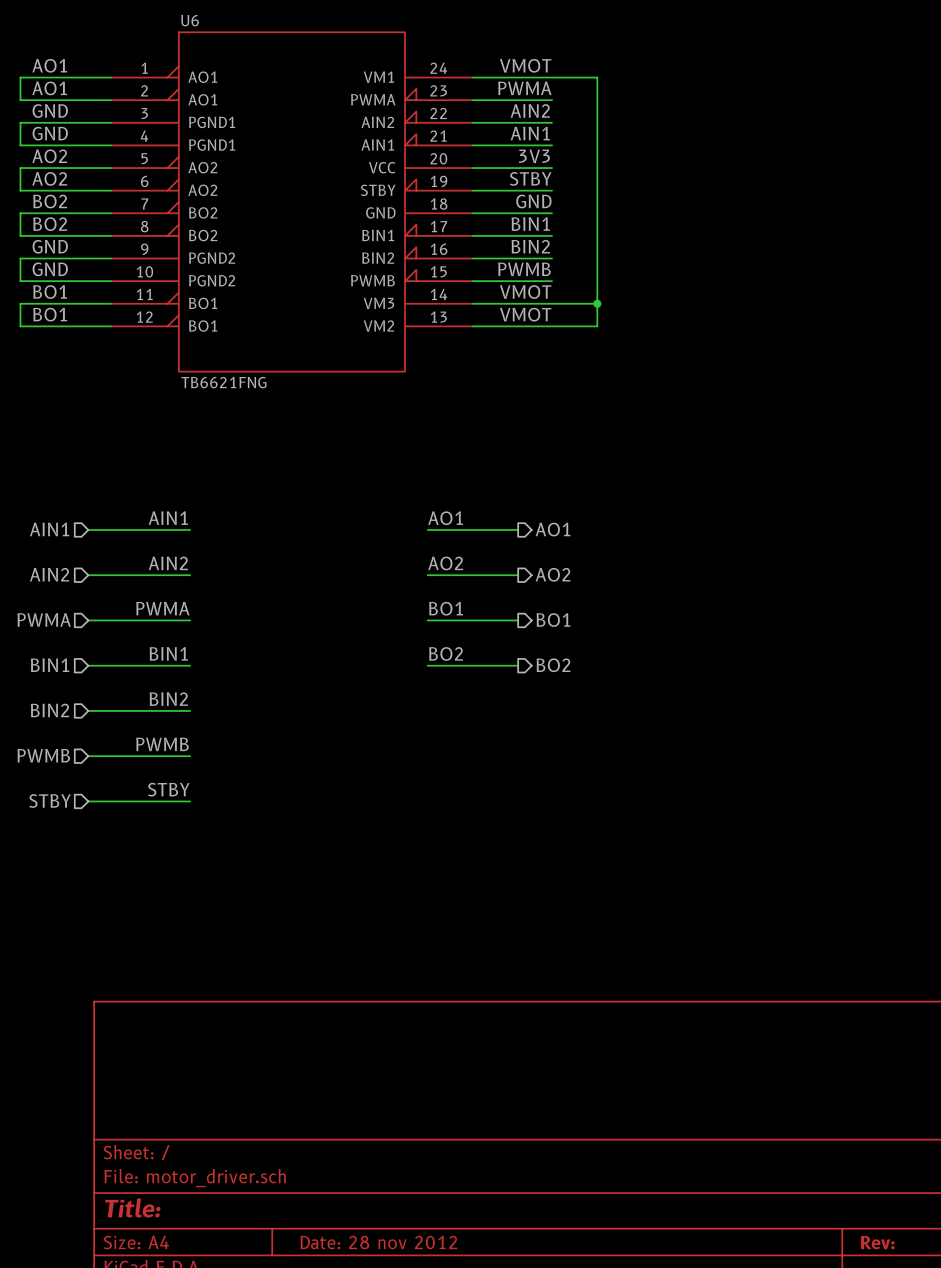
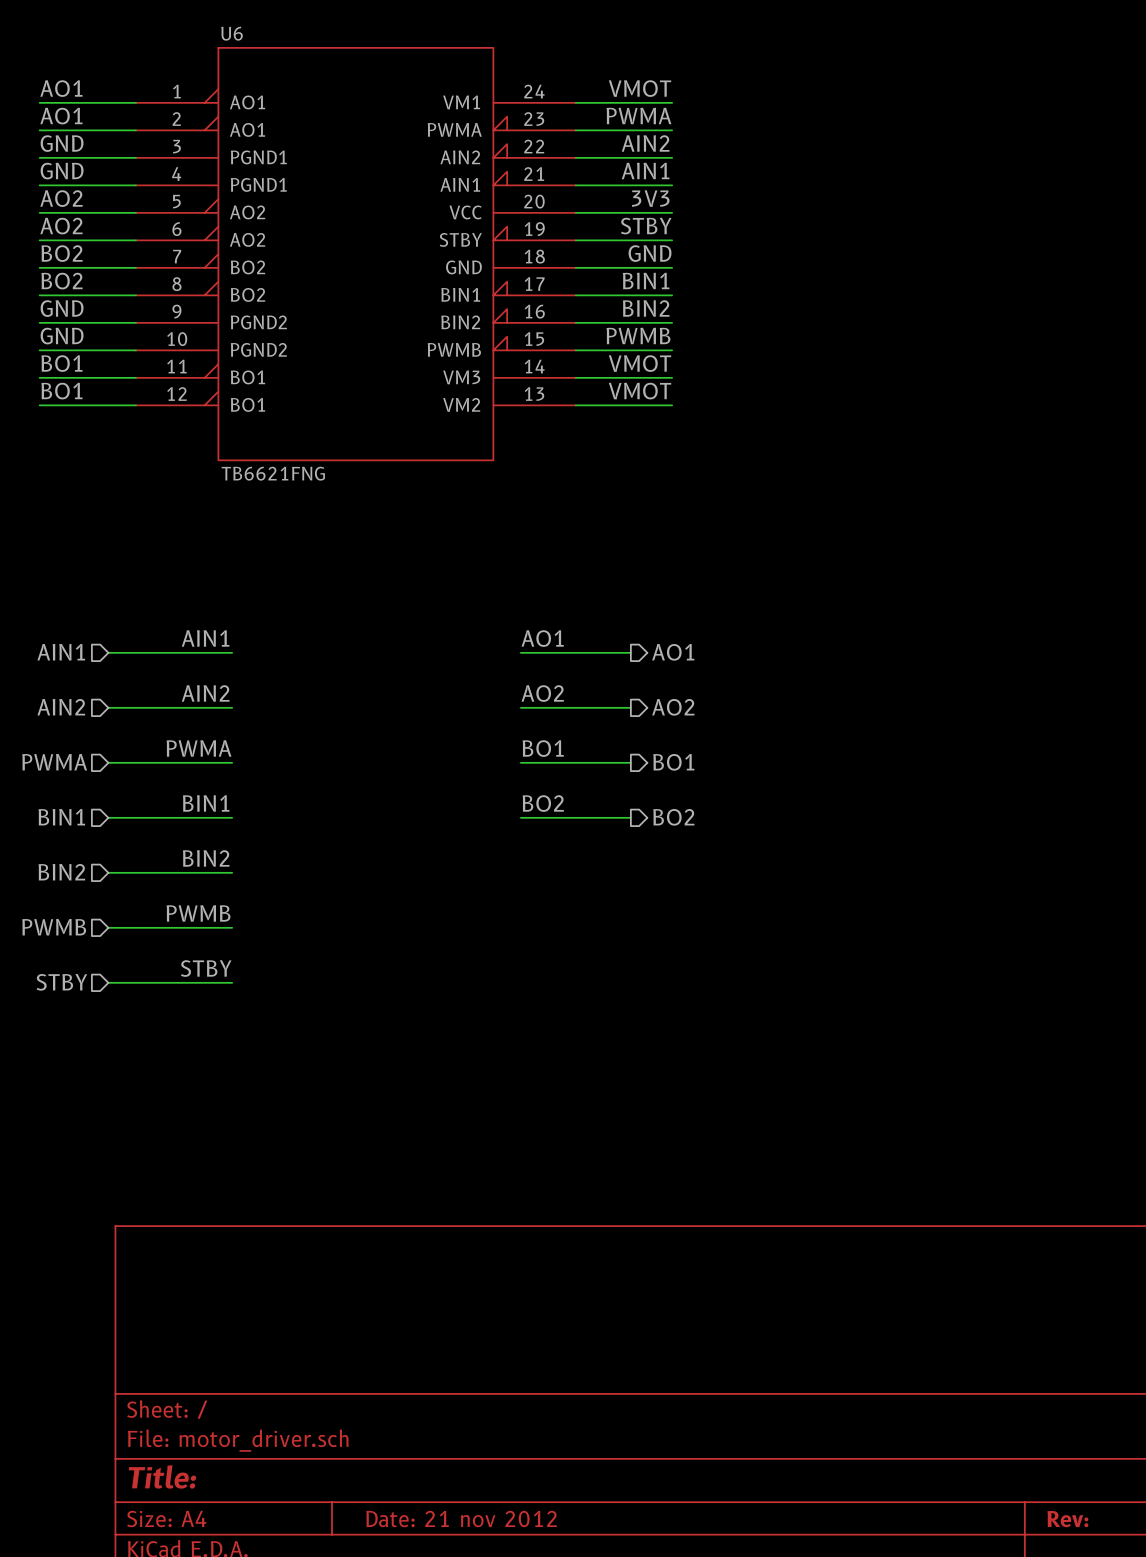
wire: (31, 77) (20, 77) (20, 100) (31, 100) -> none
wire: (552, 77) (597, 77) (597, 326) (552, 326) -> none
wire: (31, 122) (20, 122) (20, 145) (31, 145) -> none
wire: (31, 168) (20, 168) (20, 190) (31, 190) -> none
wire: (31, 213) (20, 213) (20, 235) (31, 235) -> none
wire: (31, 258) (20, 258) (20, 281) (31, 281) -> none
wire: (31, 303) (20, 303) (20, 326) (31, 326) -> none
wire: (552, 303) (597, 303) -> none
junction: (597, 303) -> none
title block: Date: 28 nov 2012 (378, 1242) -> Date: 21 nov 2012 (461, 1519)

